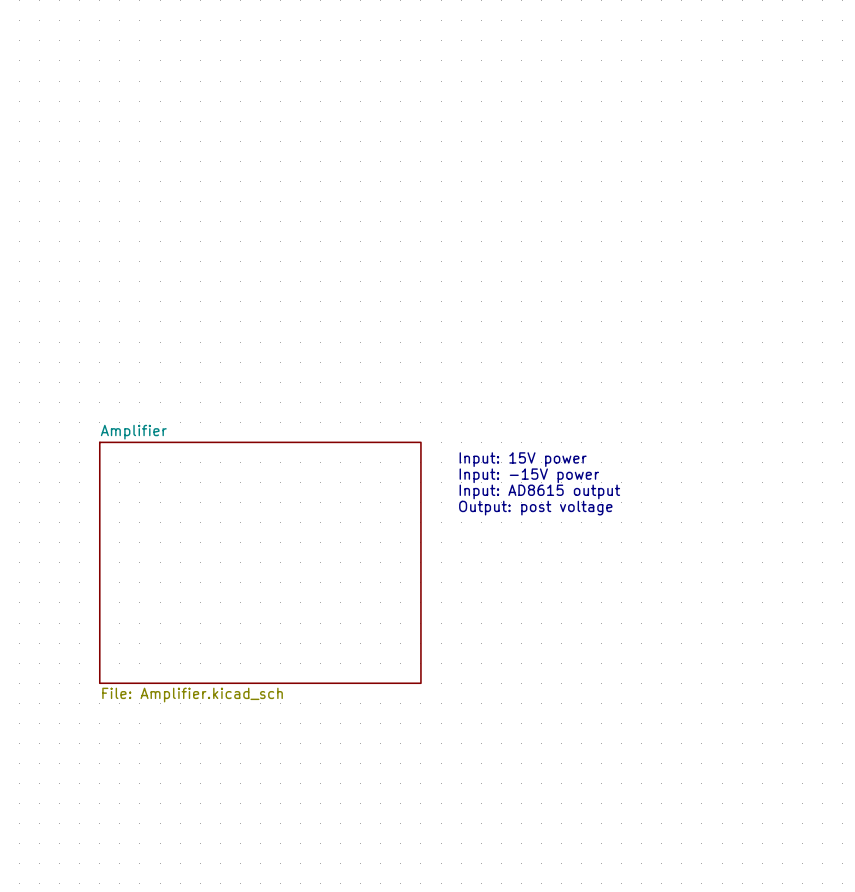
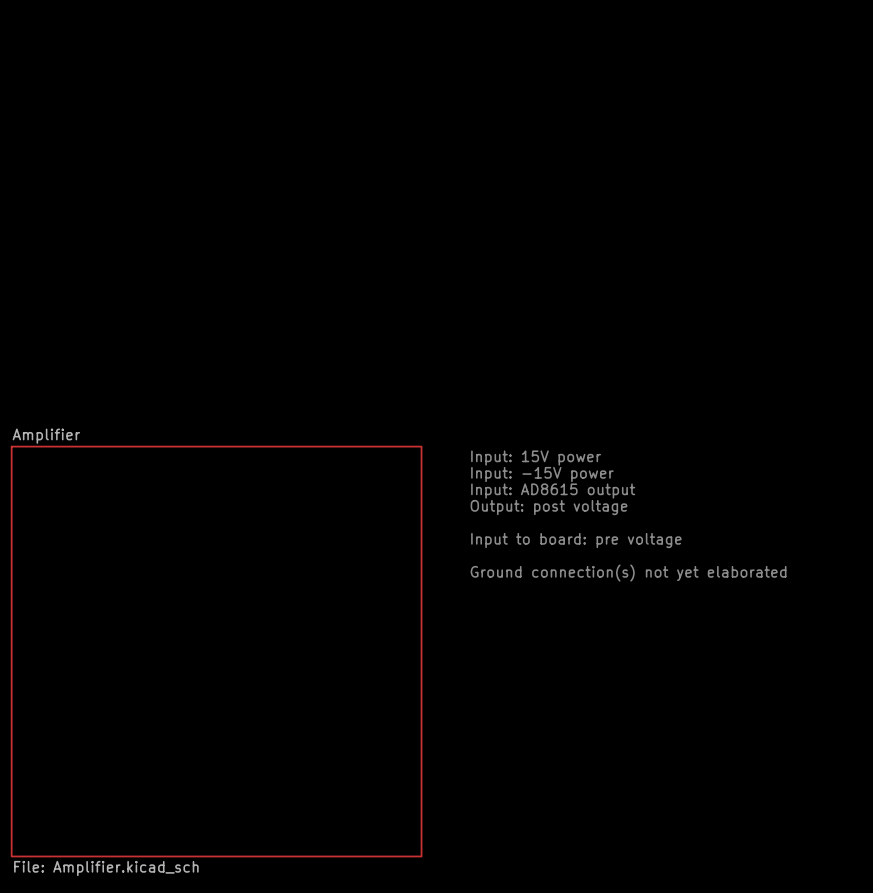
text: none -> Input to board: pre voltage (576, 540)
sheet Amplifier: File: Amplifier.kicad_sch (260, 562) -> none
text: none -> Ground connection(s) not yet elaborated (628, 573)
sheet Amplifier: none -> File: Amplifier.kicad_sch (216, 651)

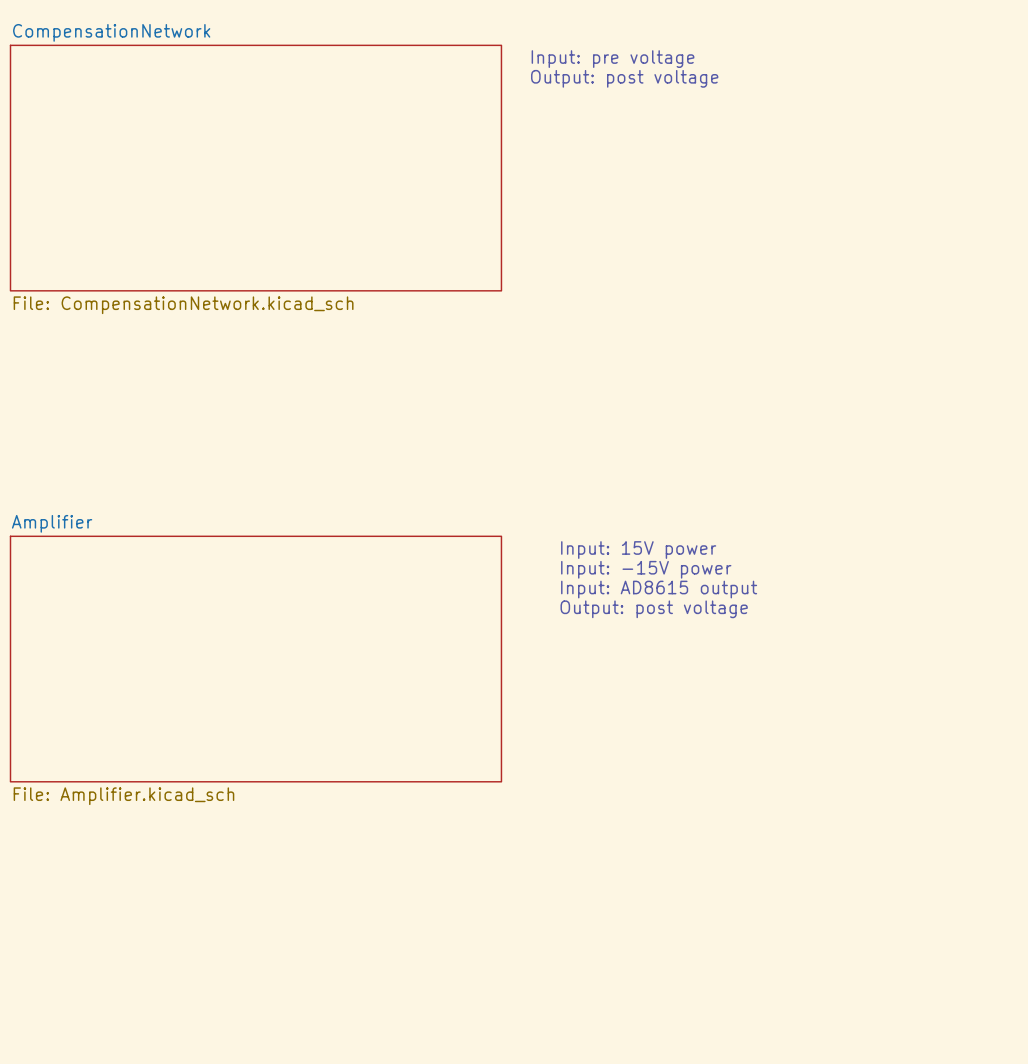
text: none -> Input: pre voltage (613, 59)
text: none -> Output: post voltage (624, 78)
sheet CompensationNetwork: none -> File: CompensationNetwork.kicad_sch (255, 168)
text: Input to board: pre voltage (576, 540) -> none
sheet Amplifier: none -> File: Amplifier.kicad_sch (255, 659)
text: Ground connection(s) not yet elaborated (628, 573) -> none
sheet Amplifier: File: Amplifier.kicad_sch (216, 651) -> none

